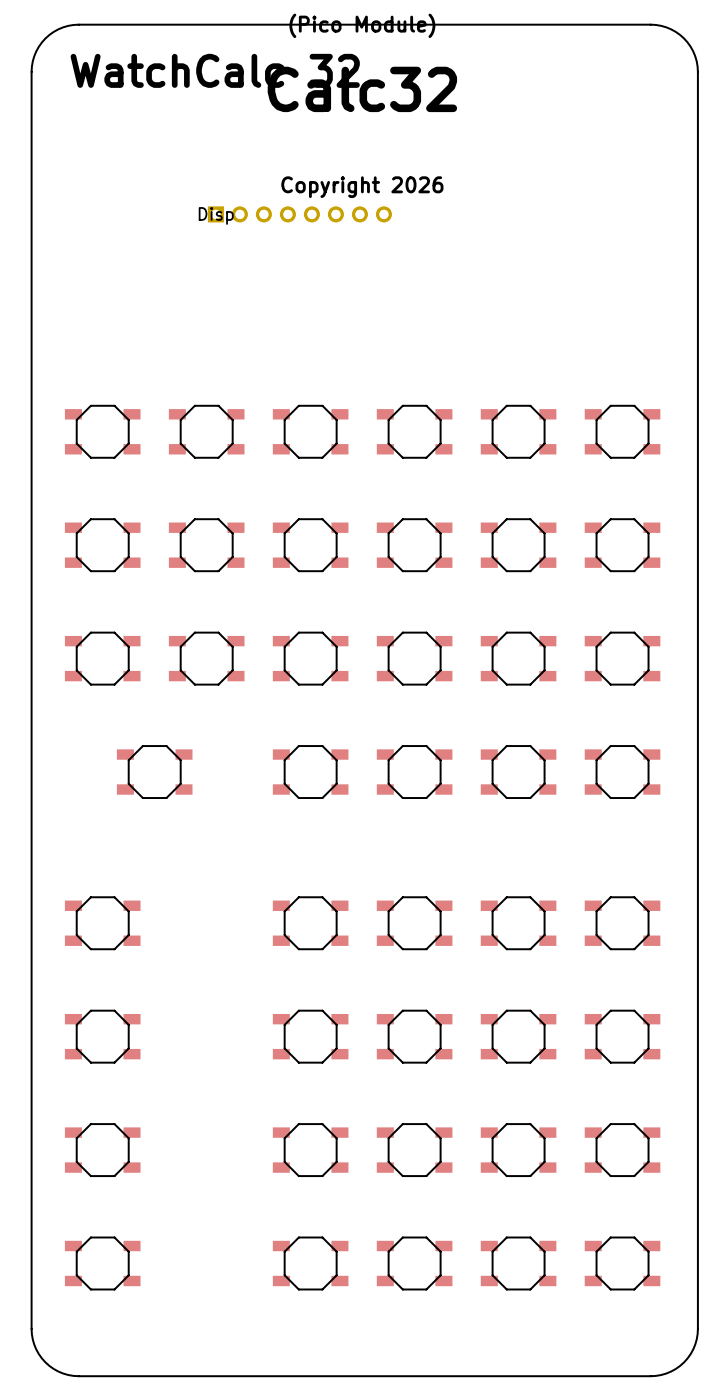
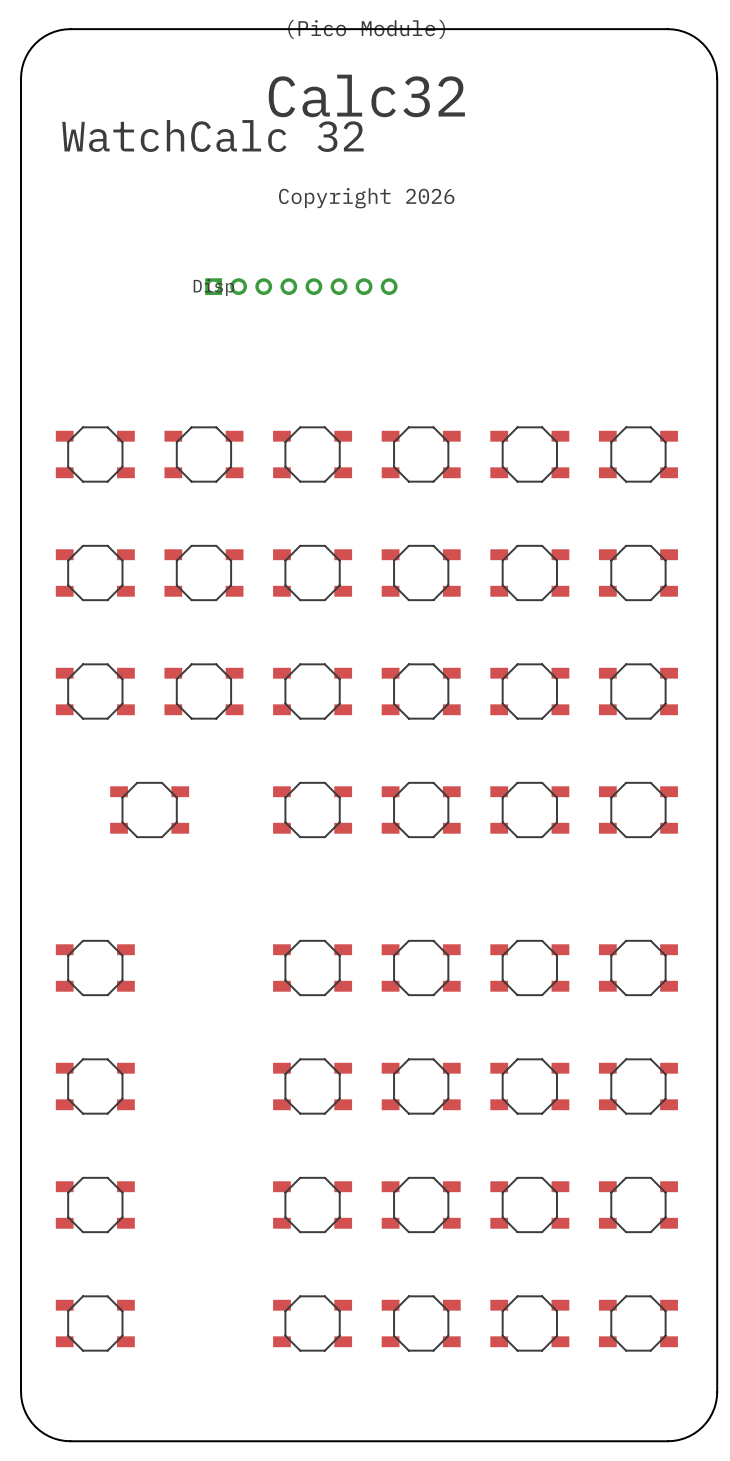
text position: WatchCalc 32 (215, 70) -> WatchCalc 32 (212, 136)
Disp position: (299, 214) -> (301, 286)

